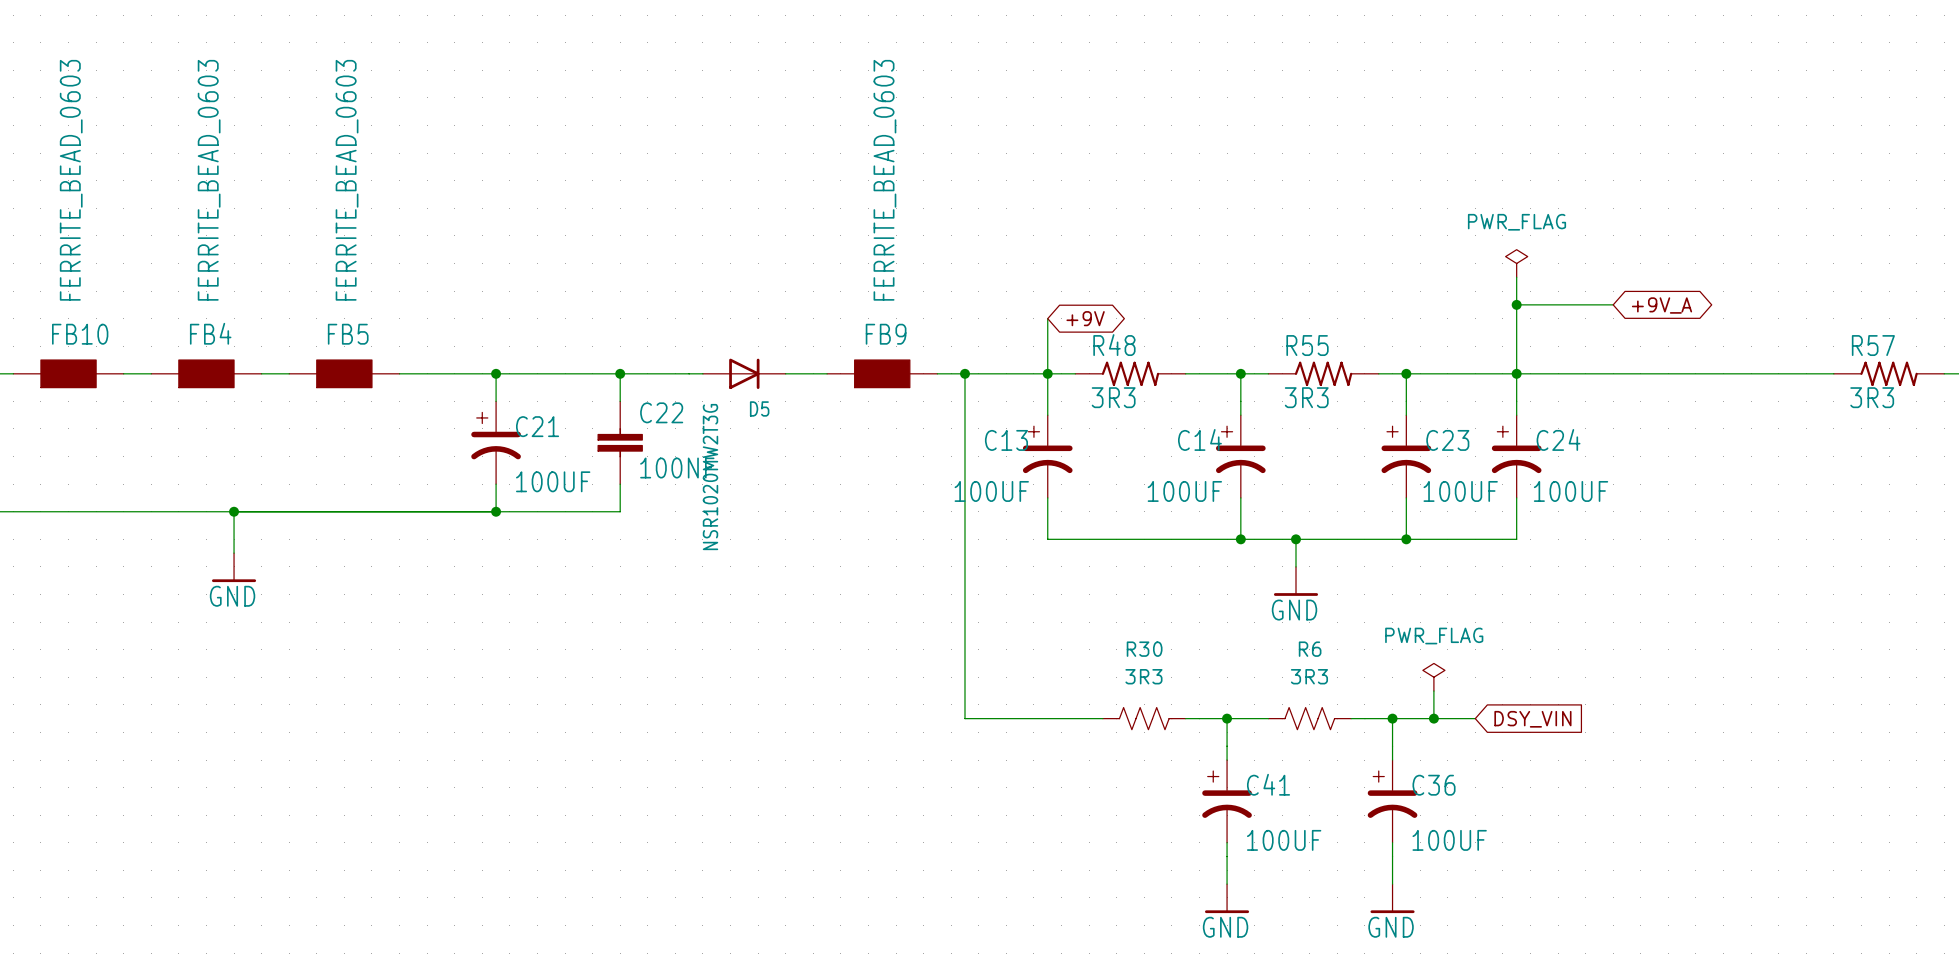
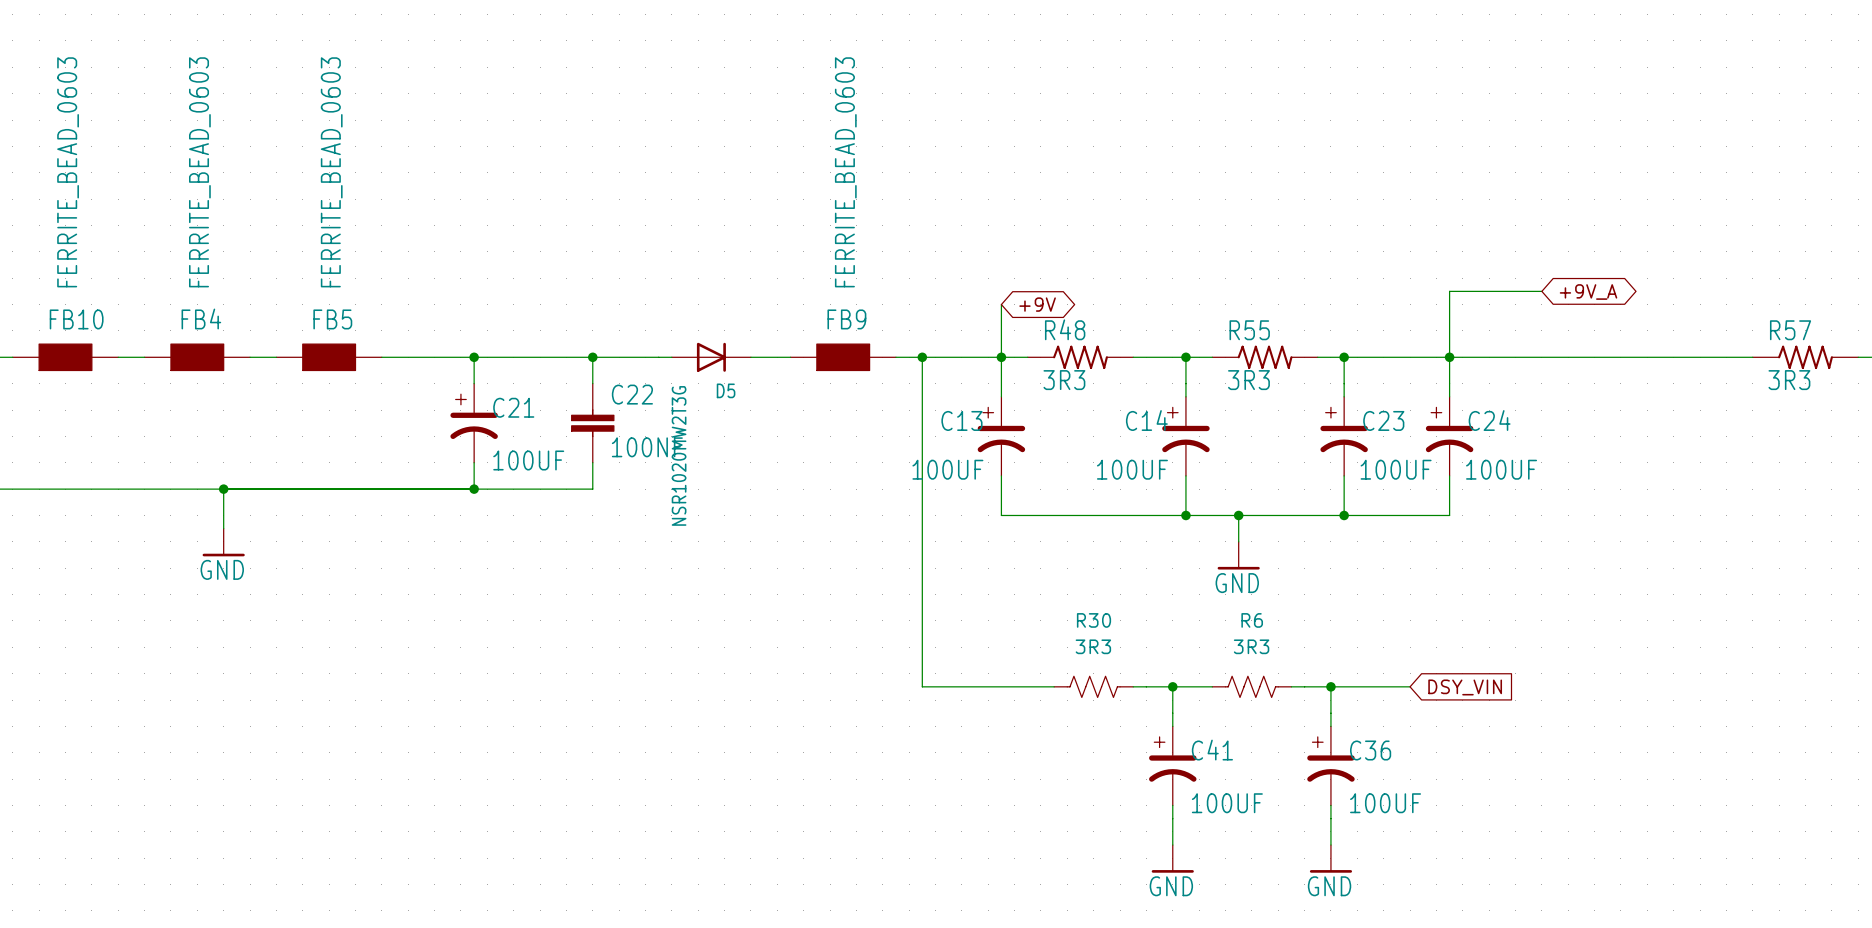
power symbol: PWR_FLAG (1516, 263) -> none
wire: (1516, 277) (1516, 304) -> none
junction: (1516, 304) -> none
power symbol: PWR_FLAG (1433, 677) -> none
wire: (1433, 691) (1433, 718) -> none
junction: (1433, 718) -> none

